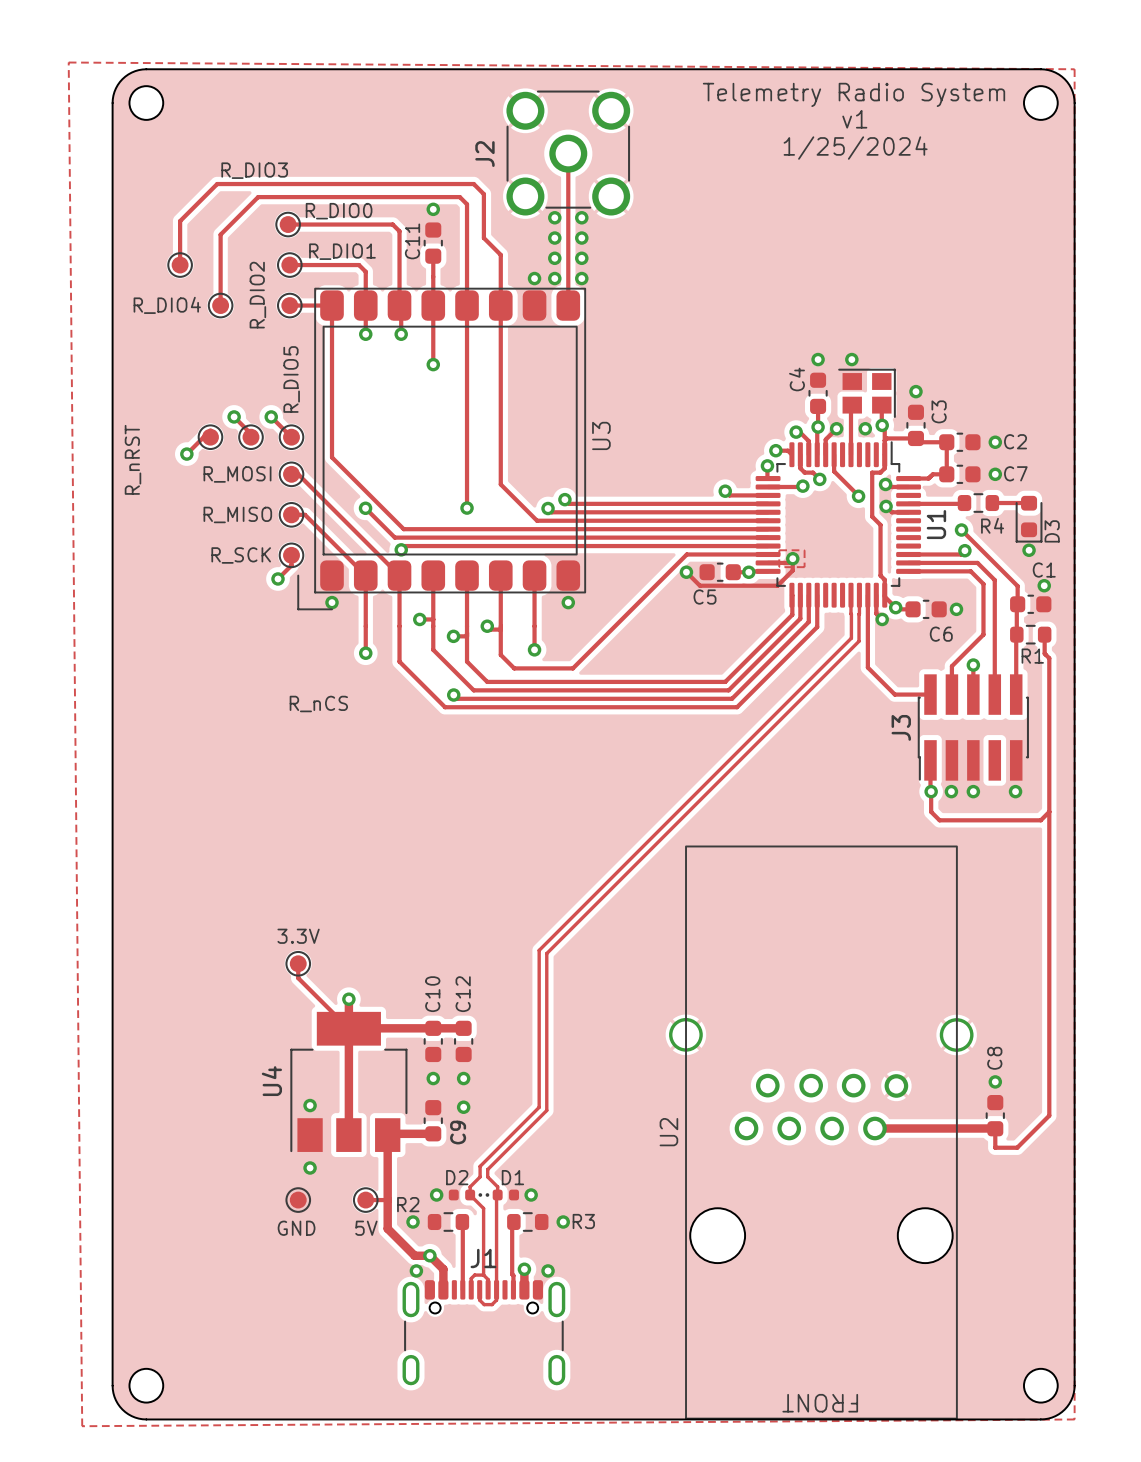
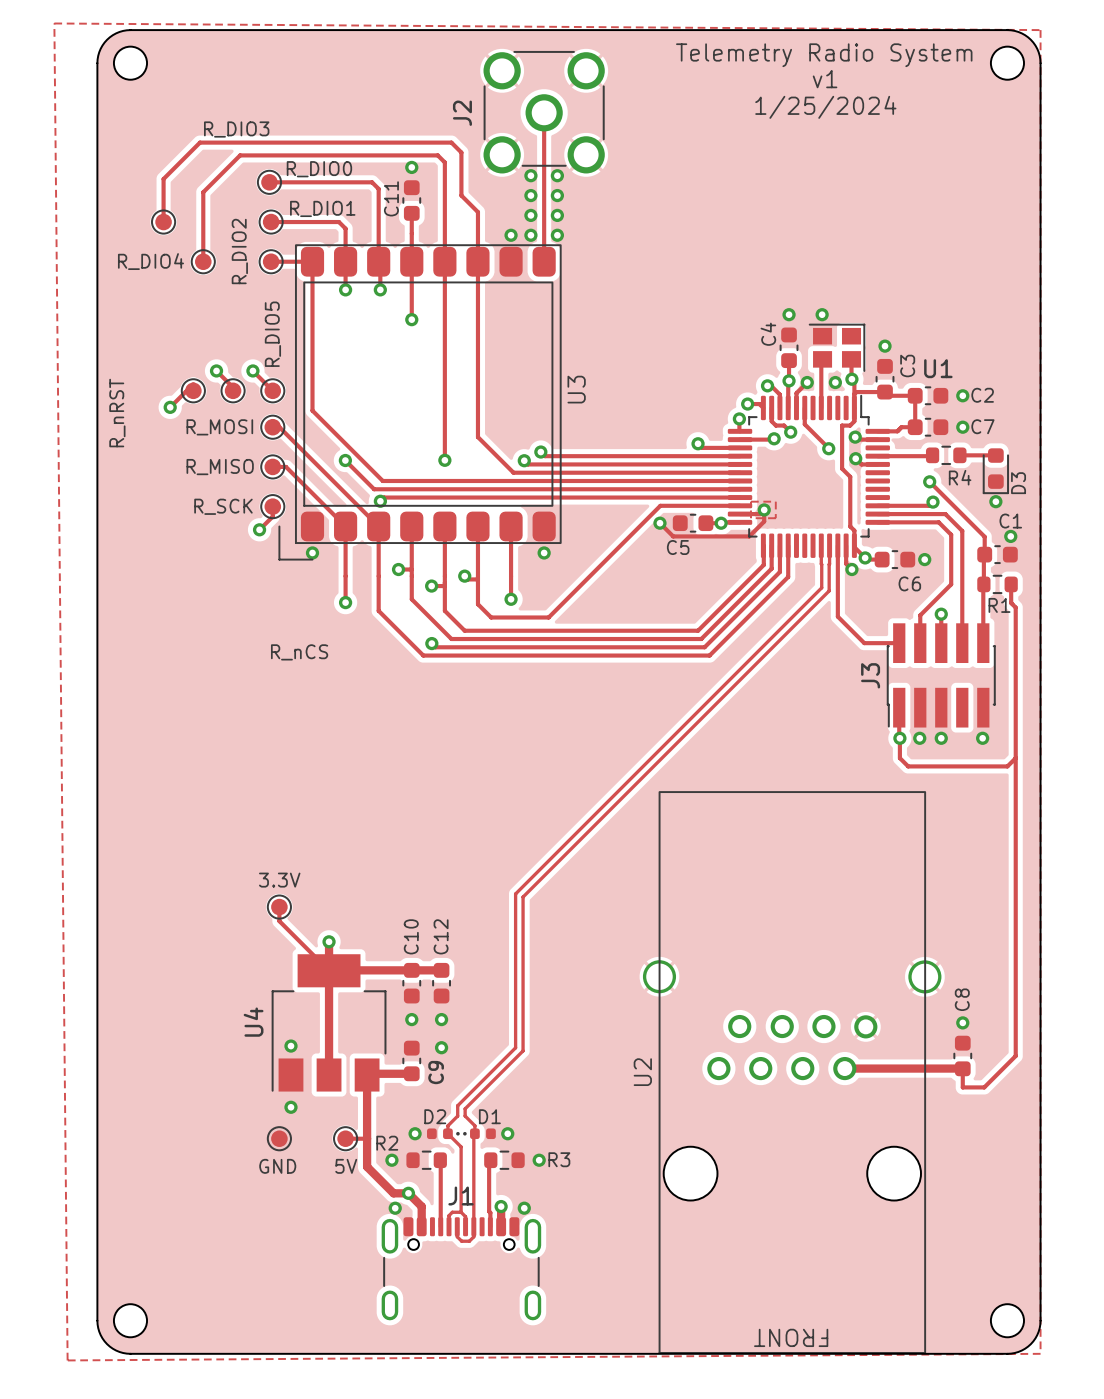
U1 name rotation: 0° (936, 524) -> 90° clockwise (938, 368)
U1 name position: U1 (936, 524) -> U1 (938, 368)

